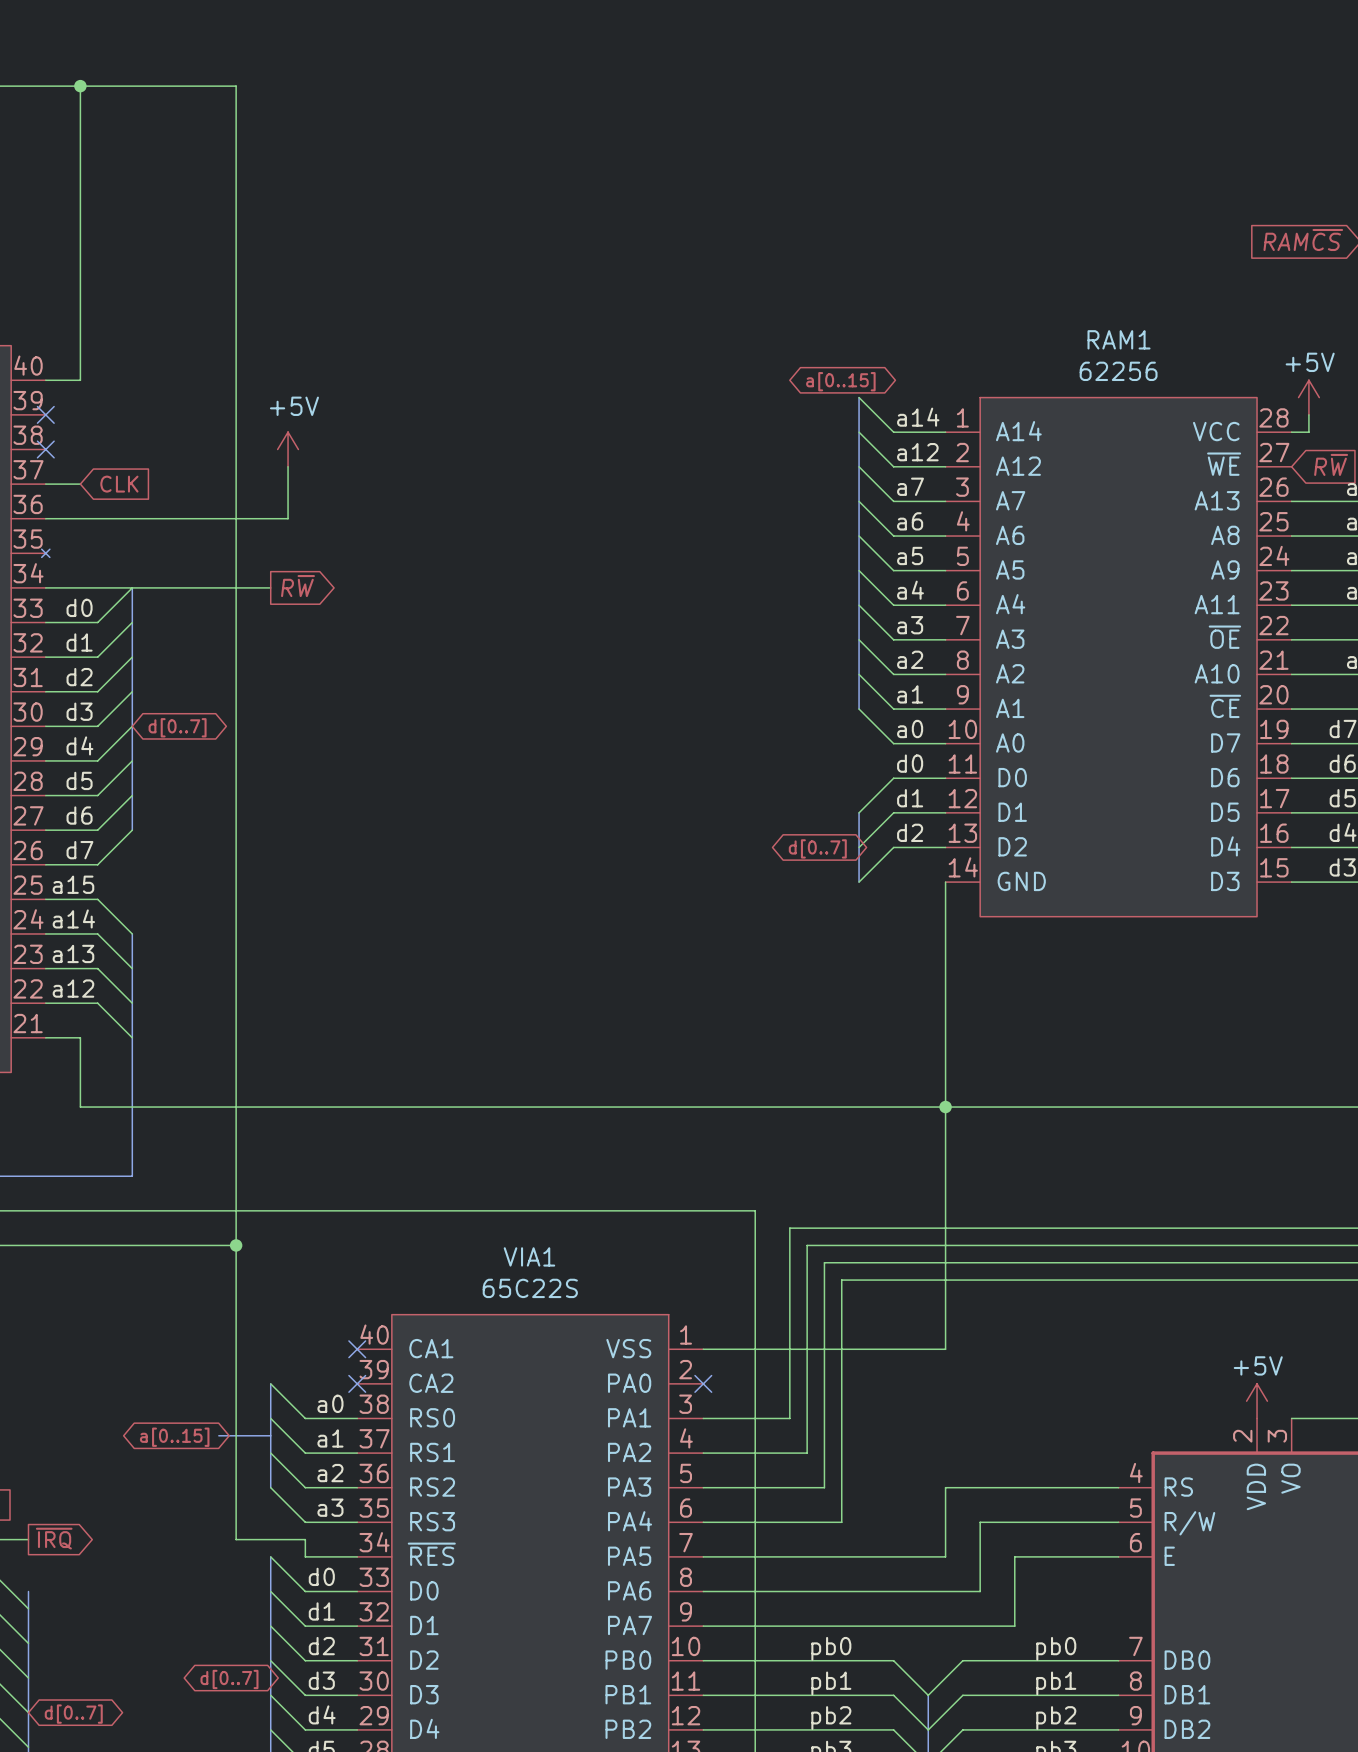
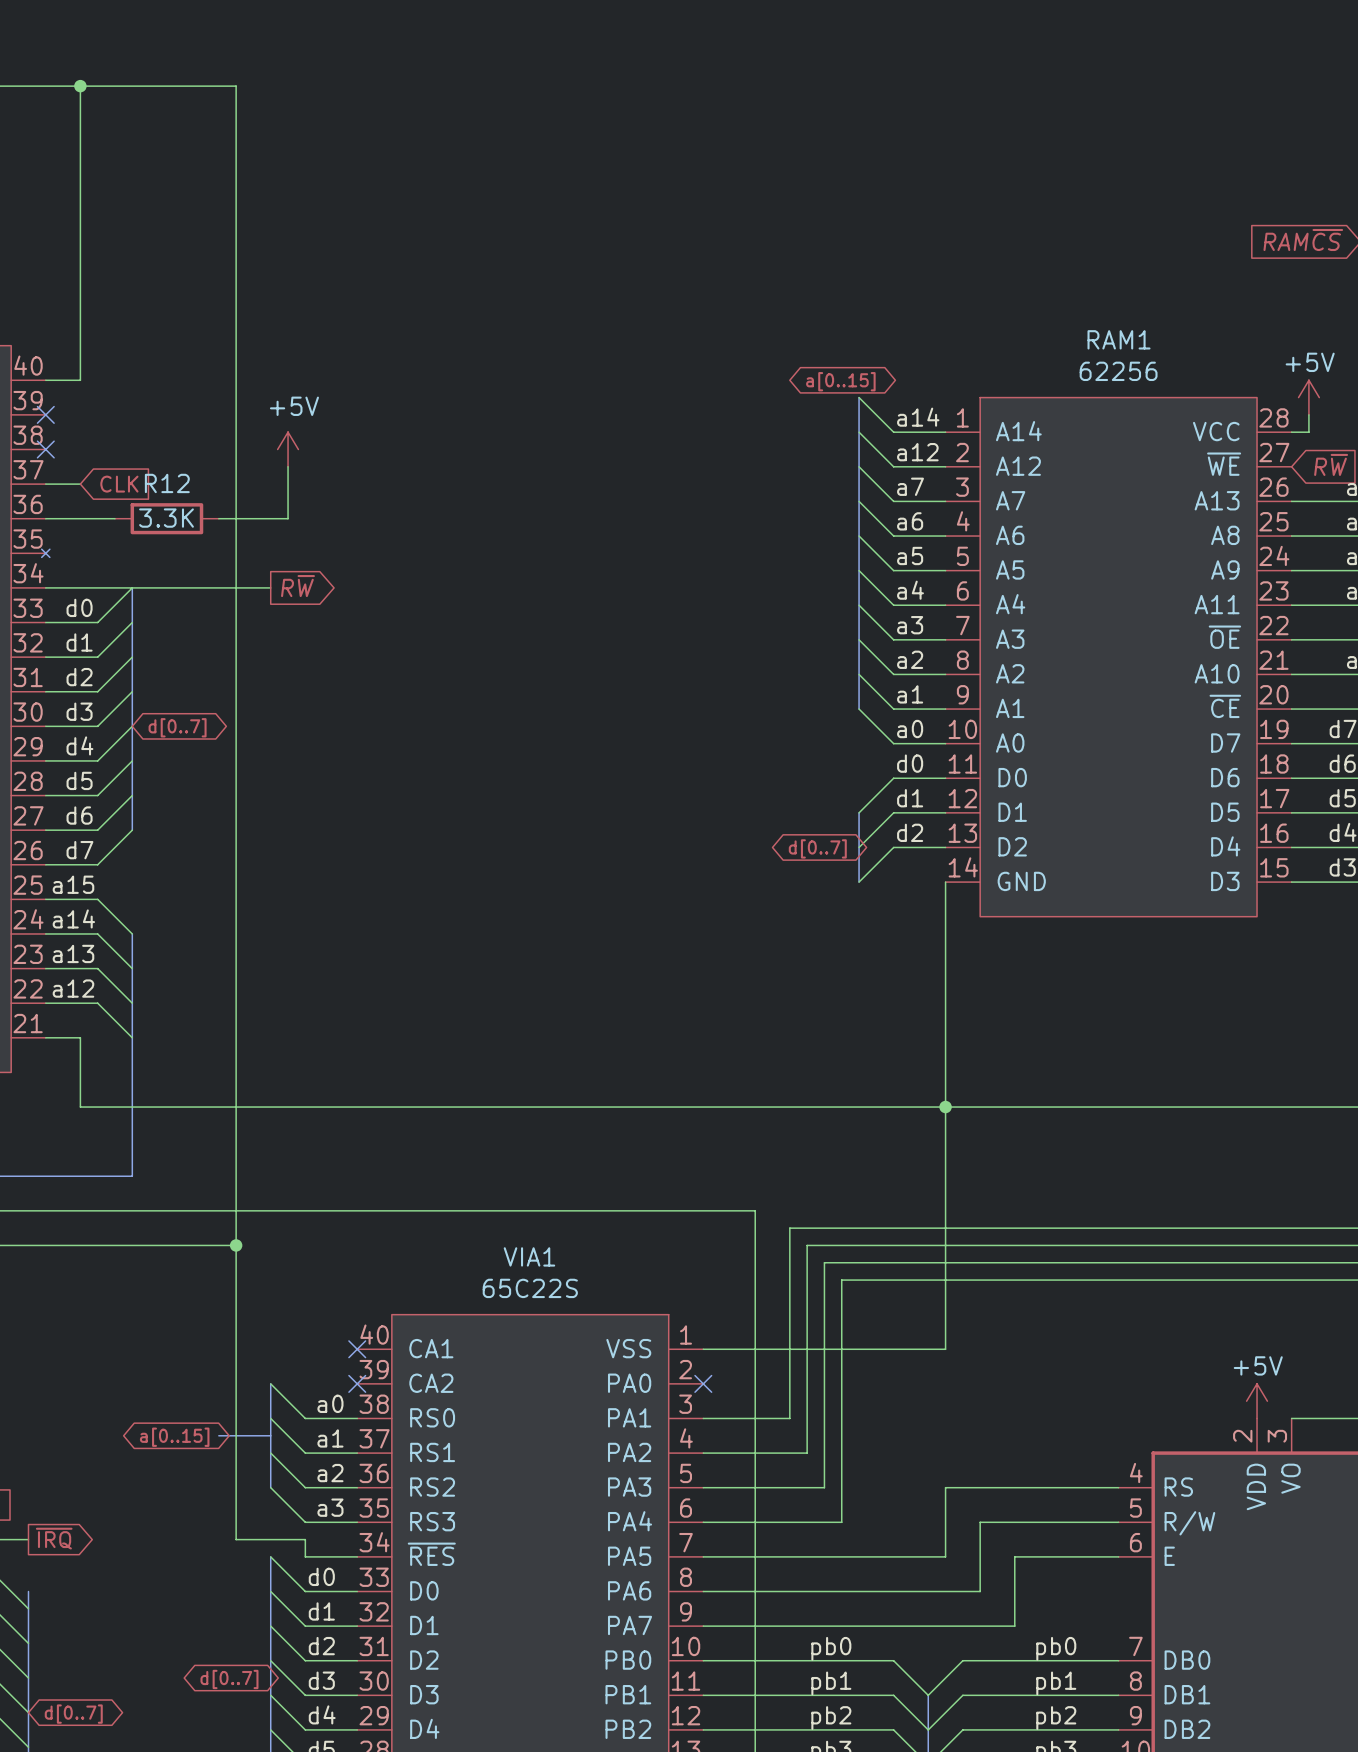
wire: (115, 518) (218, 518) -> none
R12: none -> 3.3K (166, 518)

